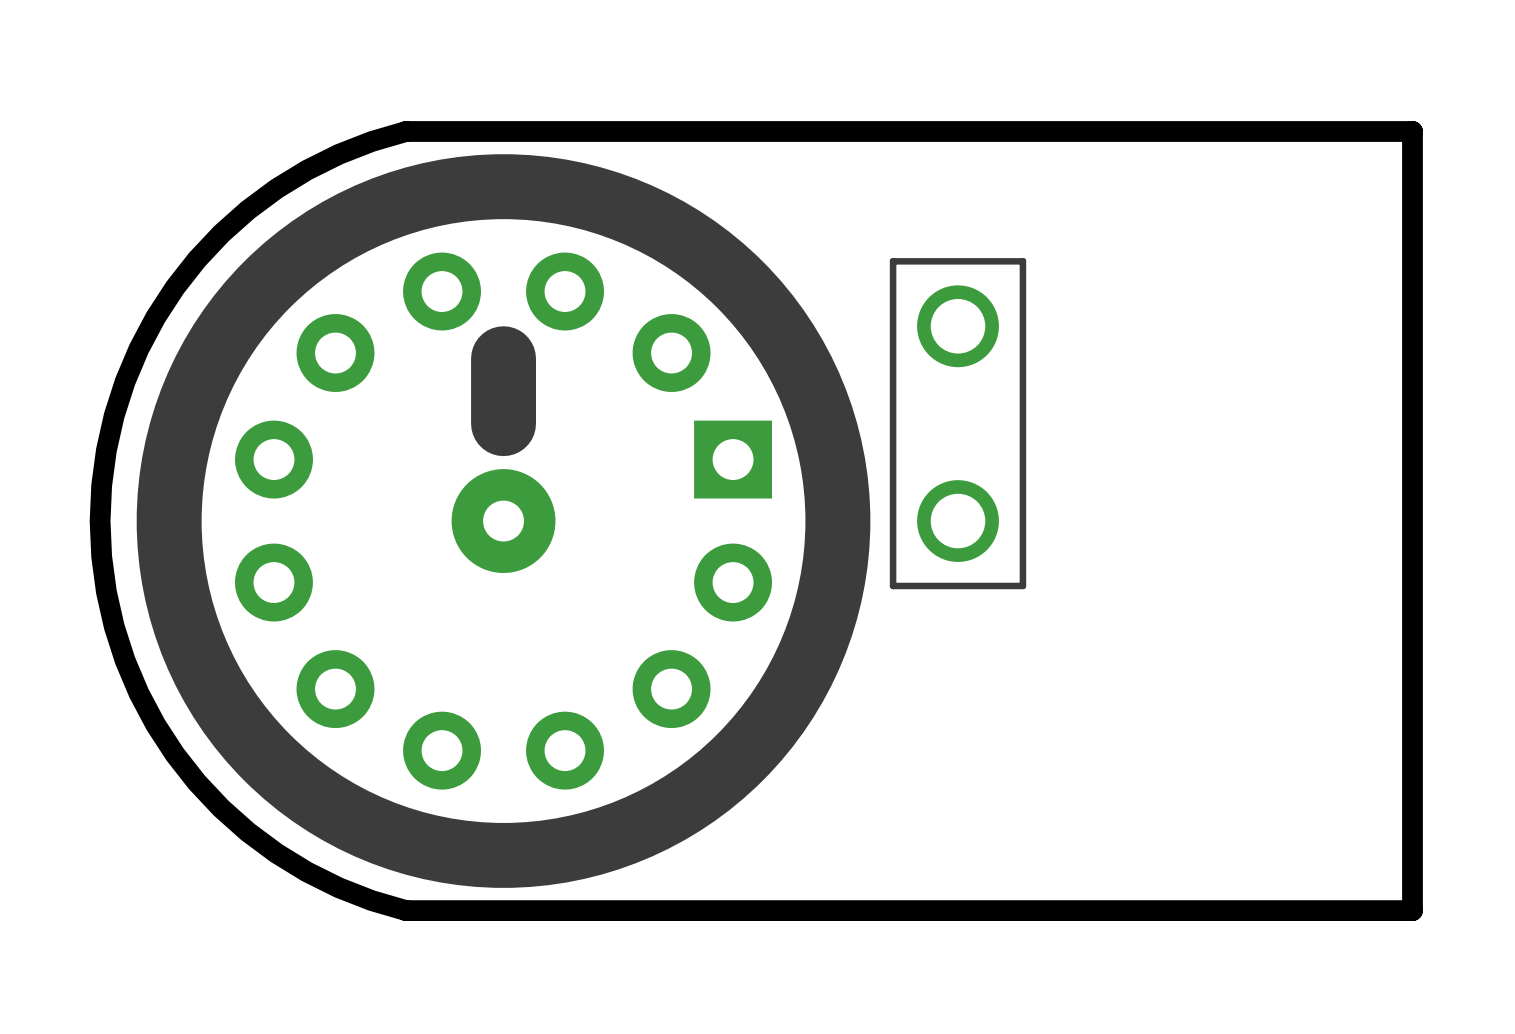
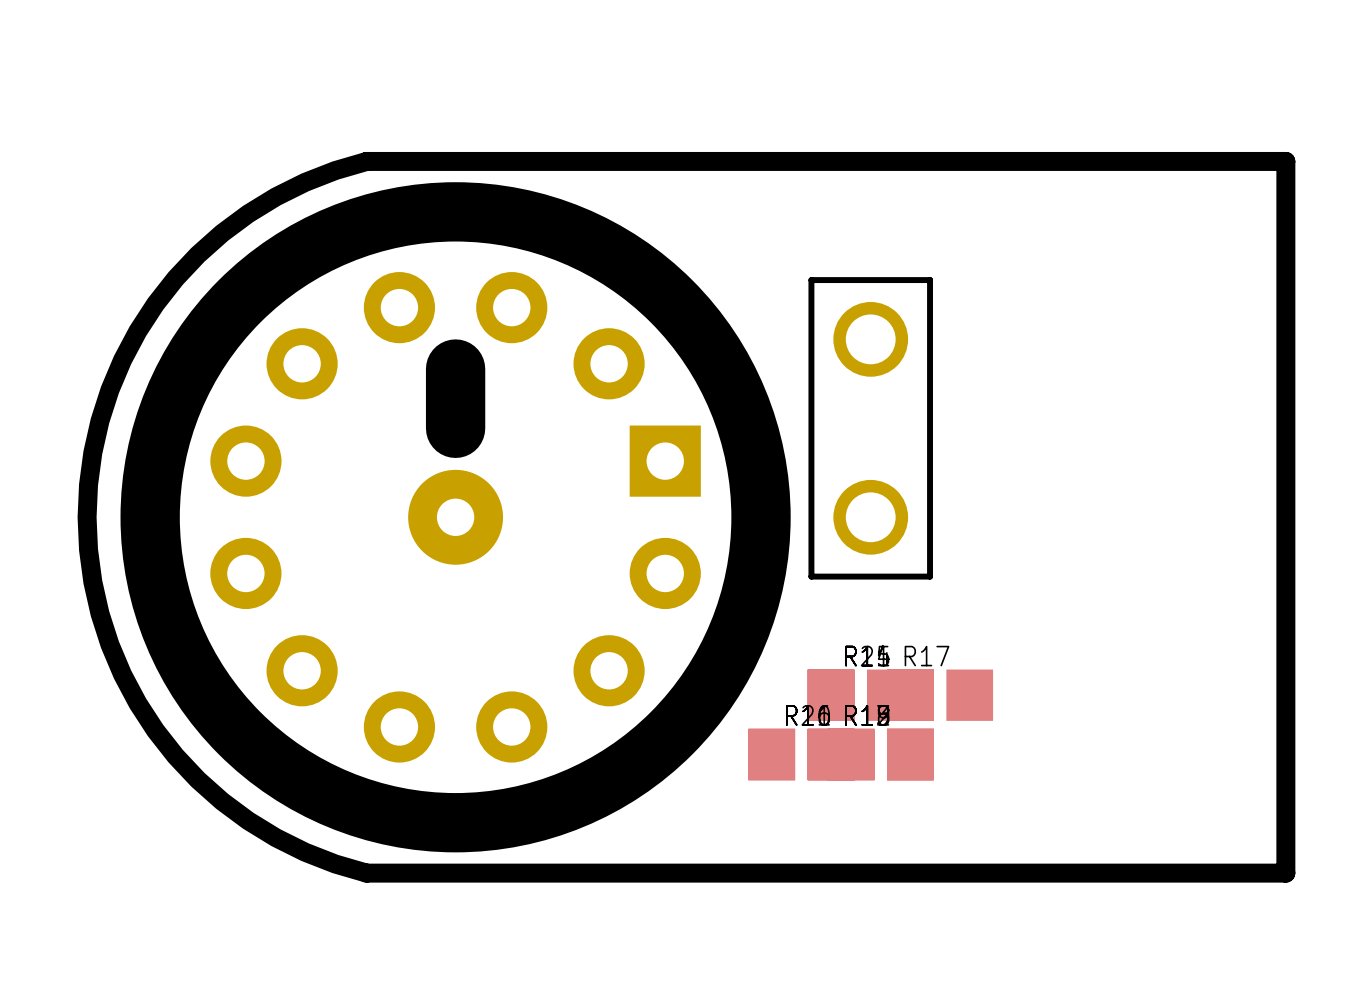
part: none -> (870, 695)
part: none -> (870, 695)
part: none -> (870, 695)
R17: none -> (930, 695)
part: none -> (811, 754)
part: none -> (811, 754)
part: none -> (811, 754)
part: none -> (870, 754)
part: none -> (870, 754)
part: none -> (870, 754)
part: none -> (870, 754)

